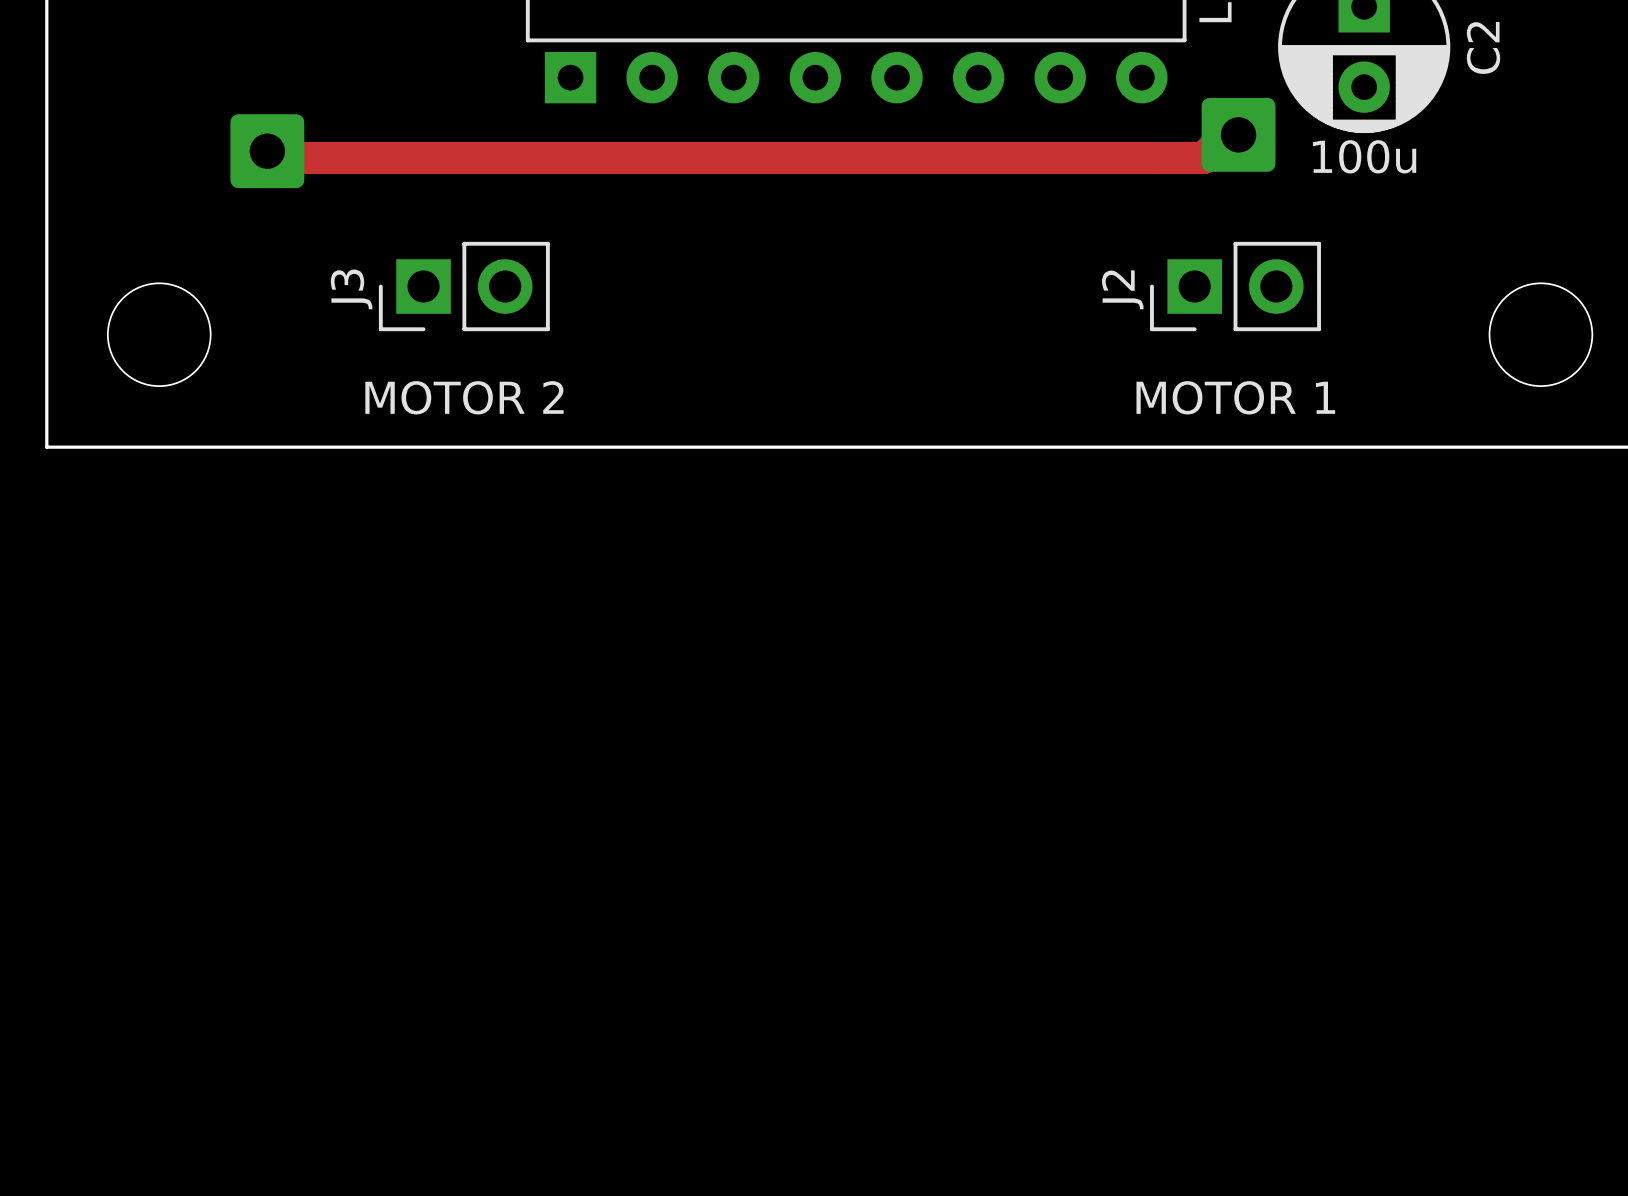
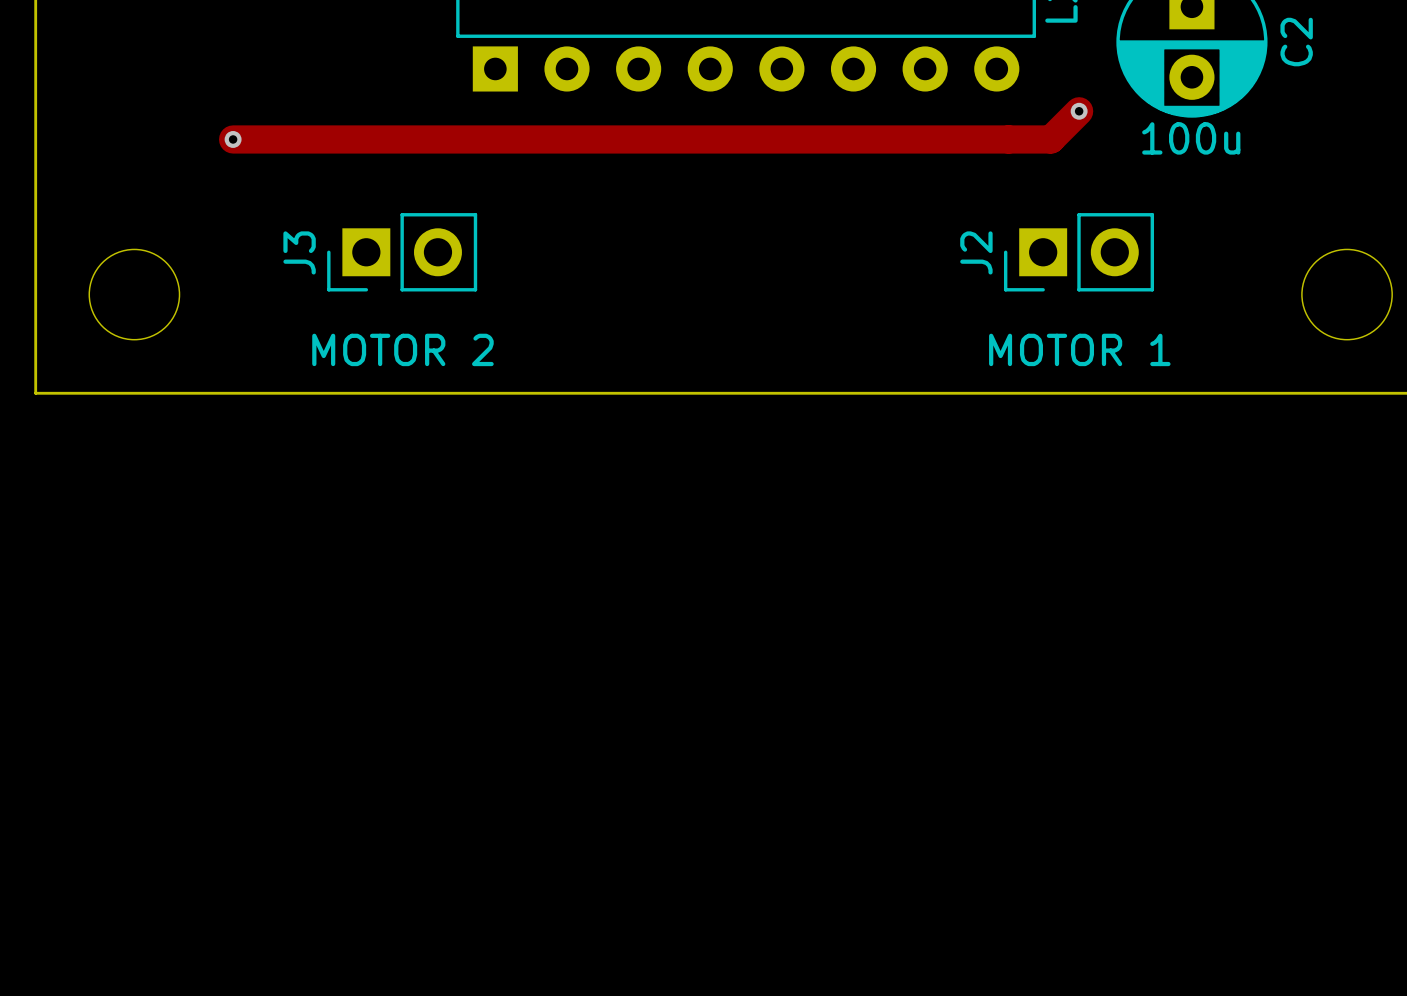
via: none -> (1079, 111)
part: (1238, 134) -> none
part: (267, 151) -> none
via: none -> (233, 139)

